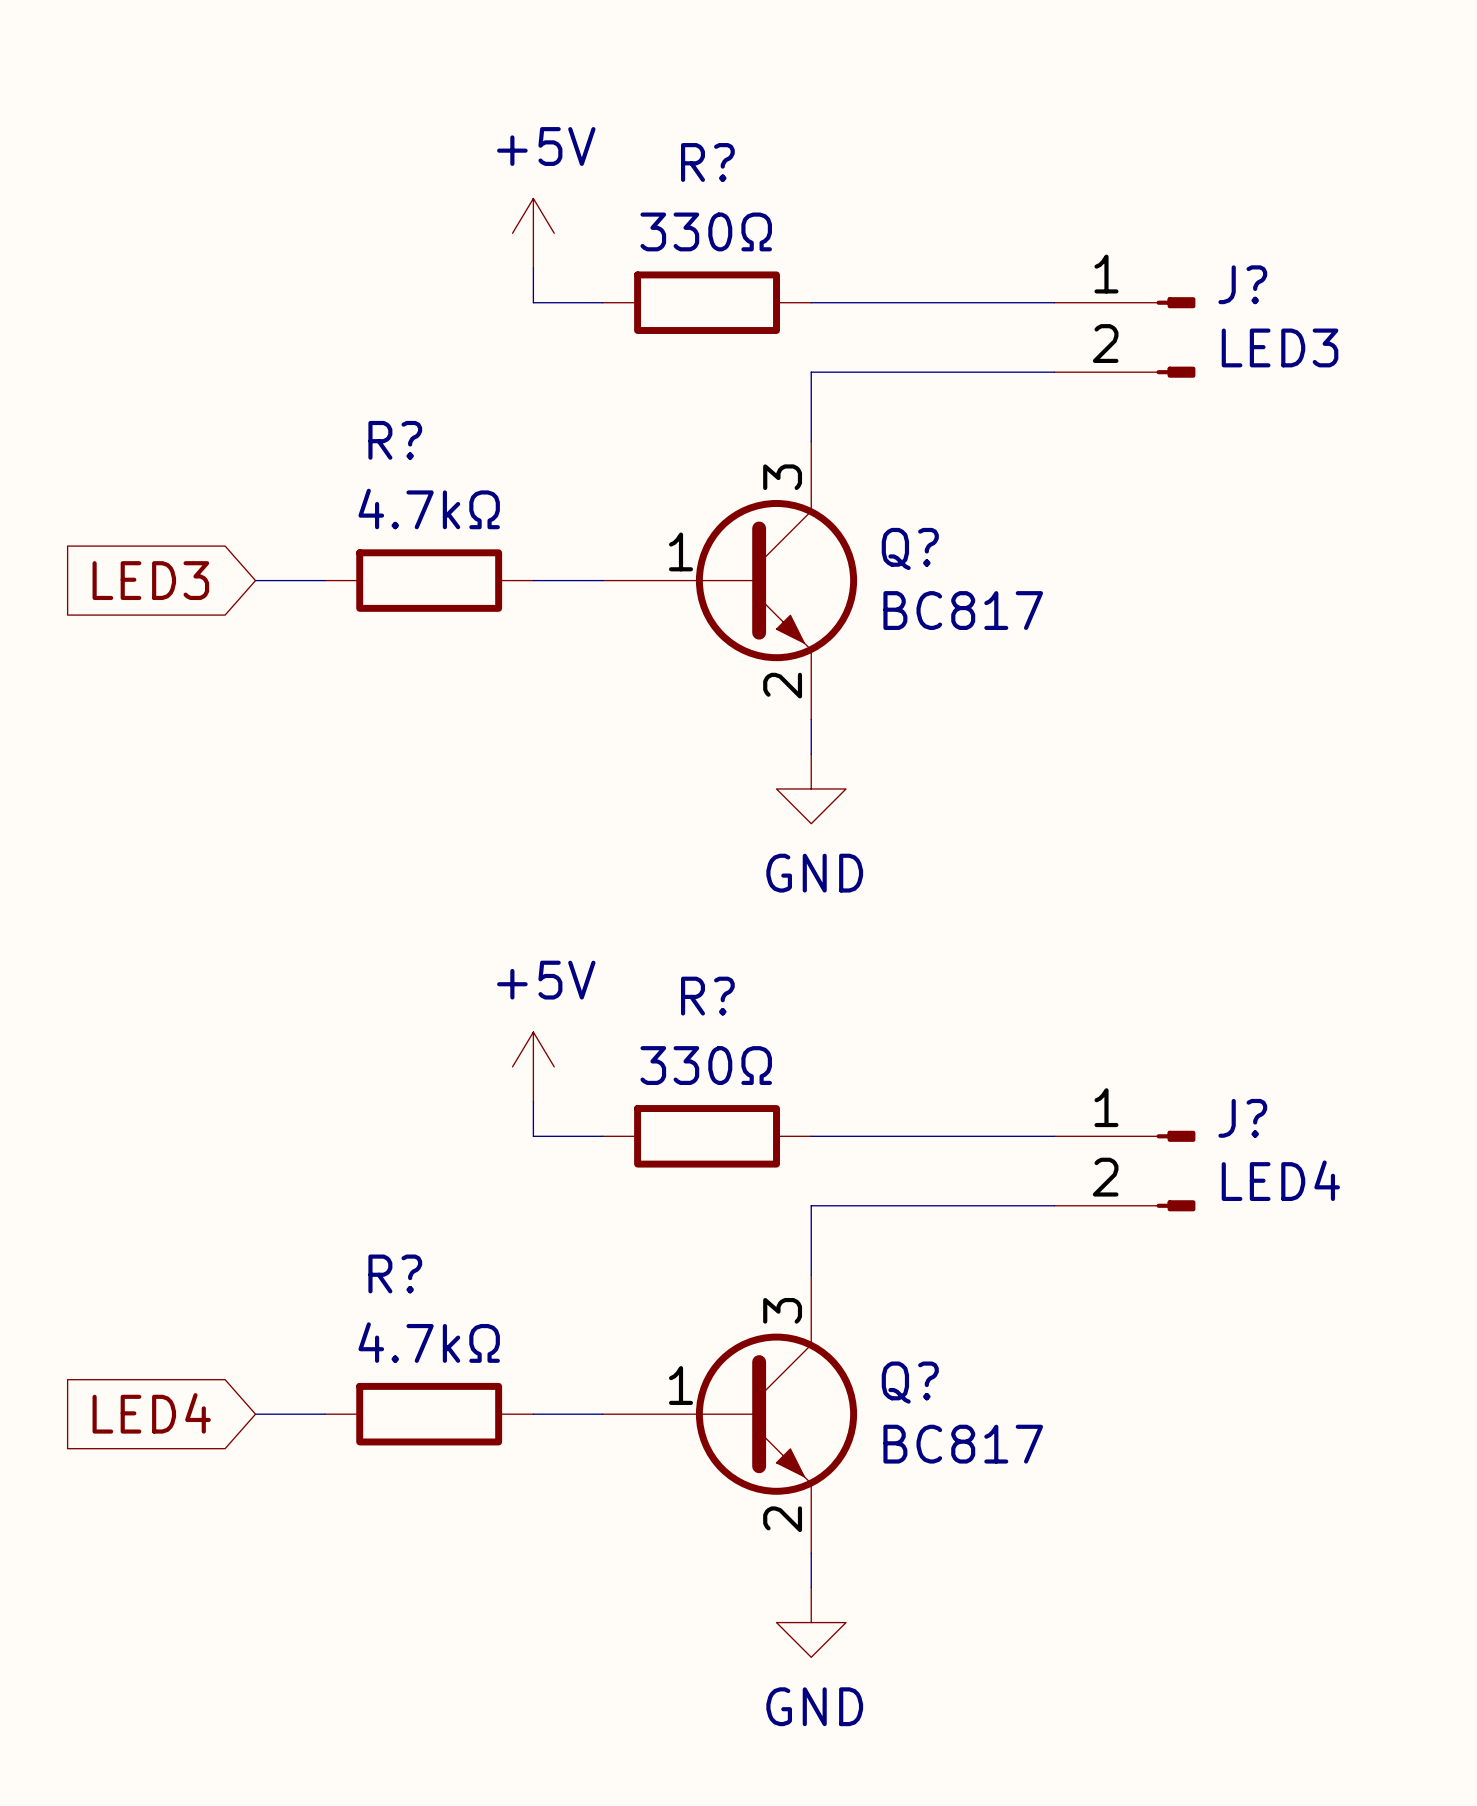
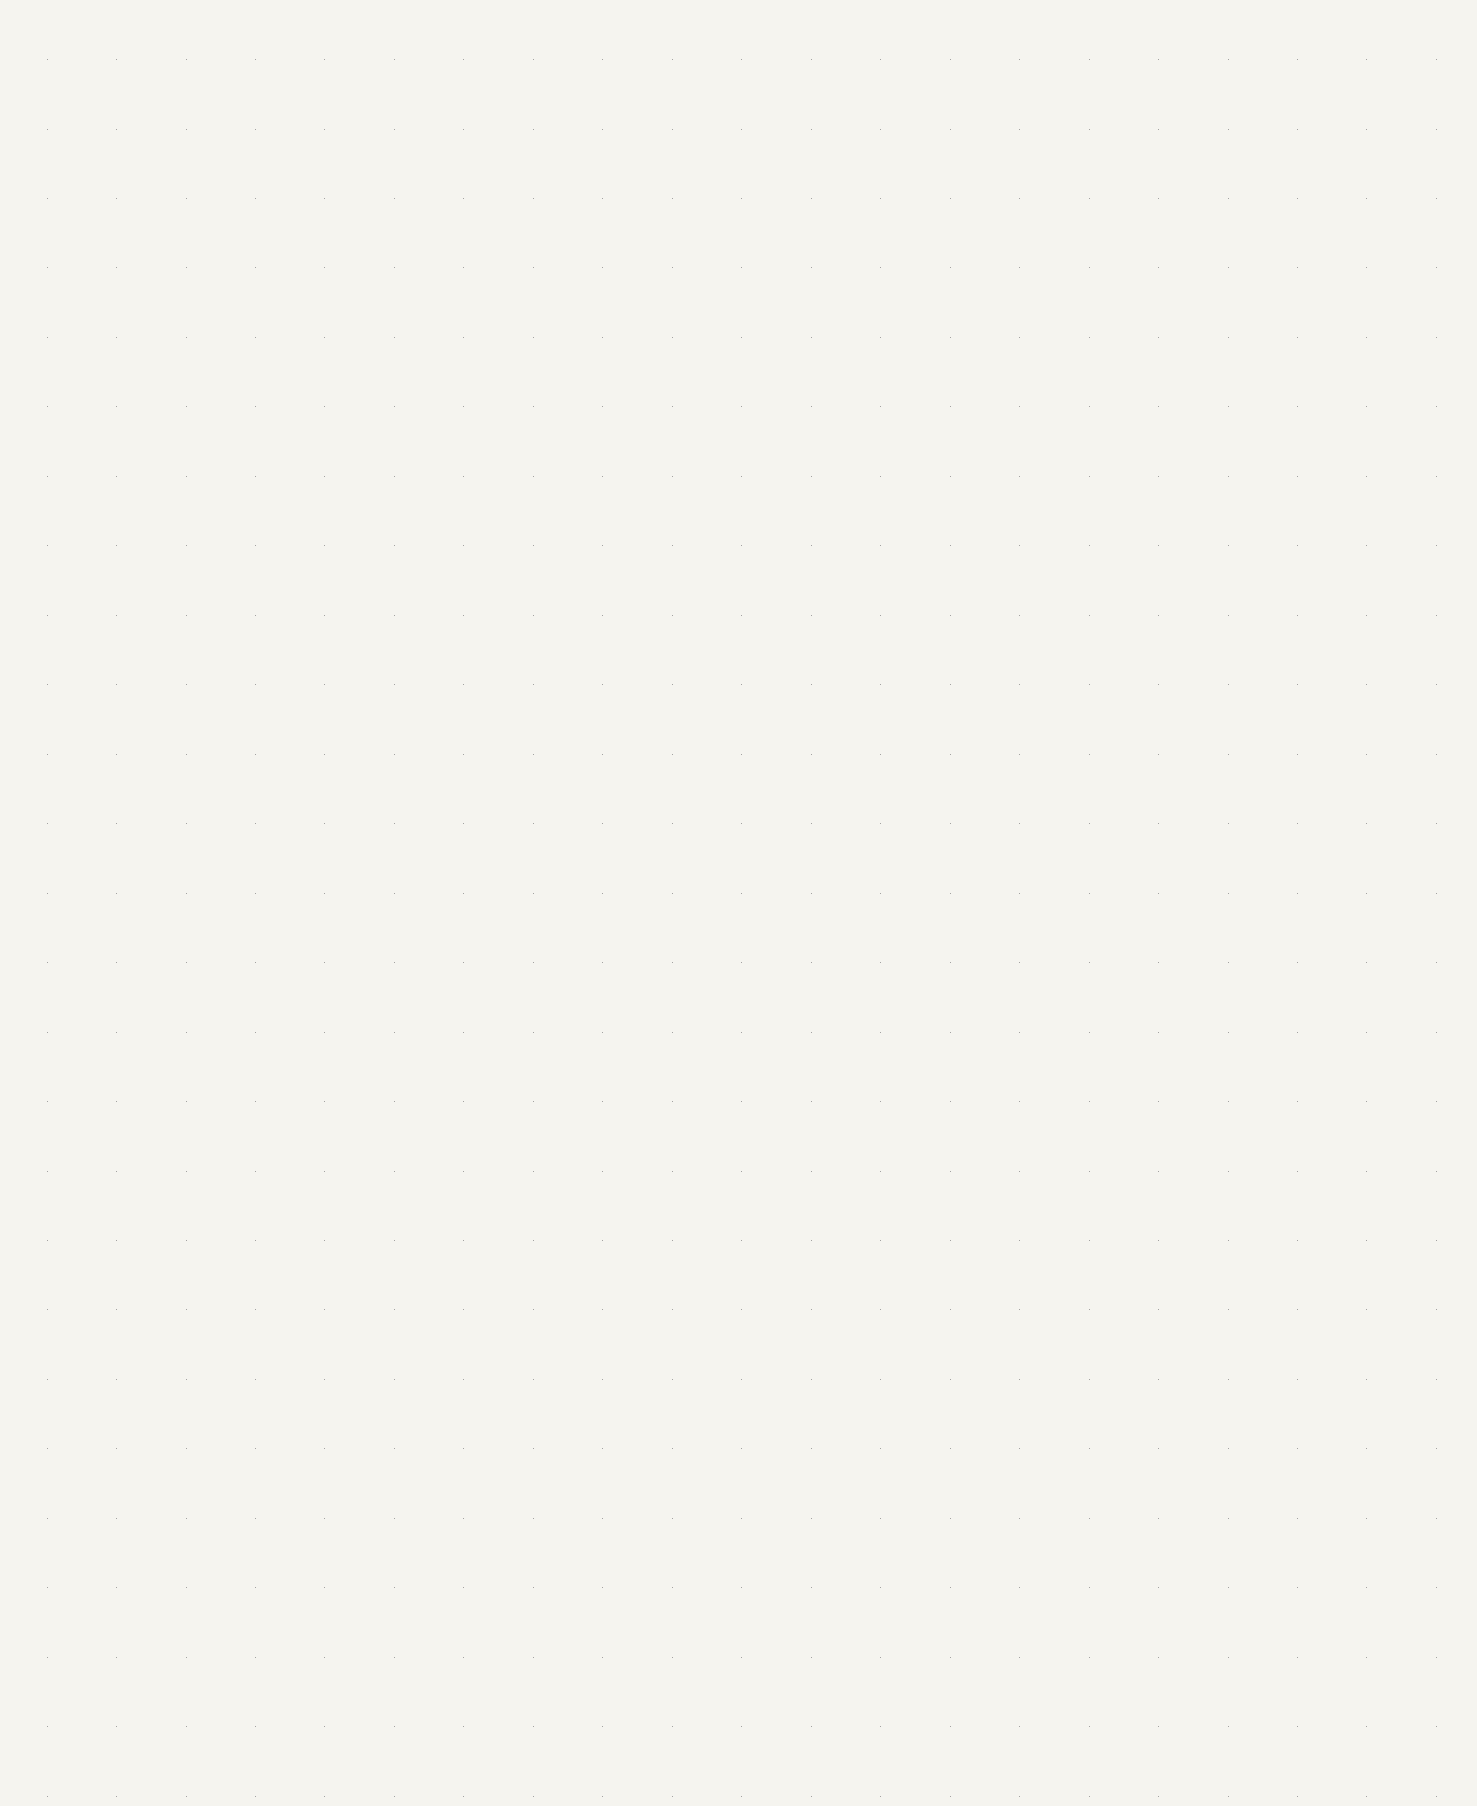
power symbol: +5V (533, 233) -> none
wire: (533, 267) (533, 302) (602, 302) -> none
R?: 330Ω (707, 302) -> none
wire: (811, 302) (1054, 302) -> none
J?: LED3 (1124, 337) -> none
wire: (1054, 372) (811, 372) (811, 441) -> none
global label: LED3 (150, 580) -> none
wire: (255, 580) (324, 580) -> none
R?: 4.7kΩ (429, 580) -> none
wire: (533, 580) (602, 580) -> none
Q?: BC817 (729, 580) -> none
wire: (811, 719) (811, 754) -> none
power symbol: GND (811, 788) -> none
power symbol: +5V (533, 1066) -> none
wire: (533, 1101) (533, 1136) (602, 1136) -> none
R?: 330Ω (707, 1136) -> none
wire: (811, 1136) (1054, 1136) -> none
J?: LED4 (1124, 1171) -> none
wire: (1054, 1205) (811, 1205) (811, 1275) -> none
global label: LED4 (151, 1413) -> none
wire: (255, 1414) (324, 1414) -> none
R?: 4.7kΩ (429, 1414) -> none
wire: (533, 1414) (602, 1414) -> none
Q?: BC817 (729, 1414) -> none
wire: (811, 1553) (811, 1587) -> none
power symbol: GND (811, 1622) -> none

